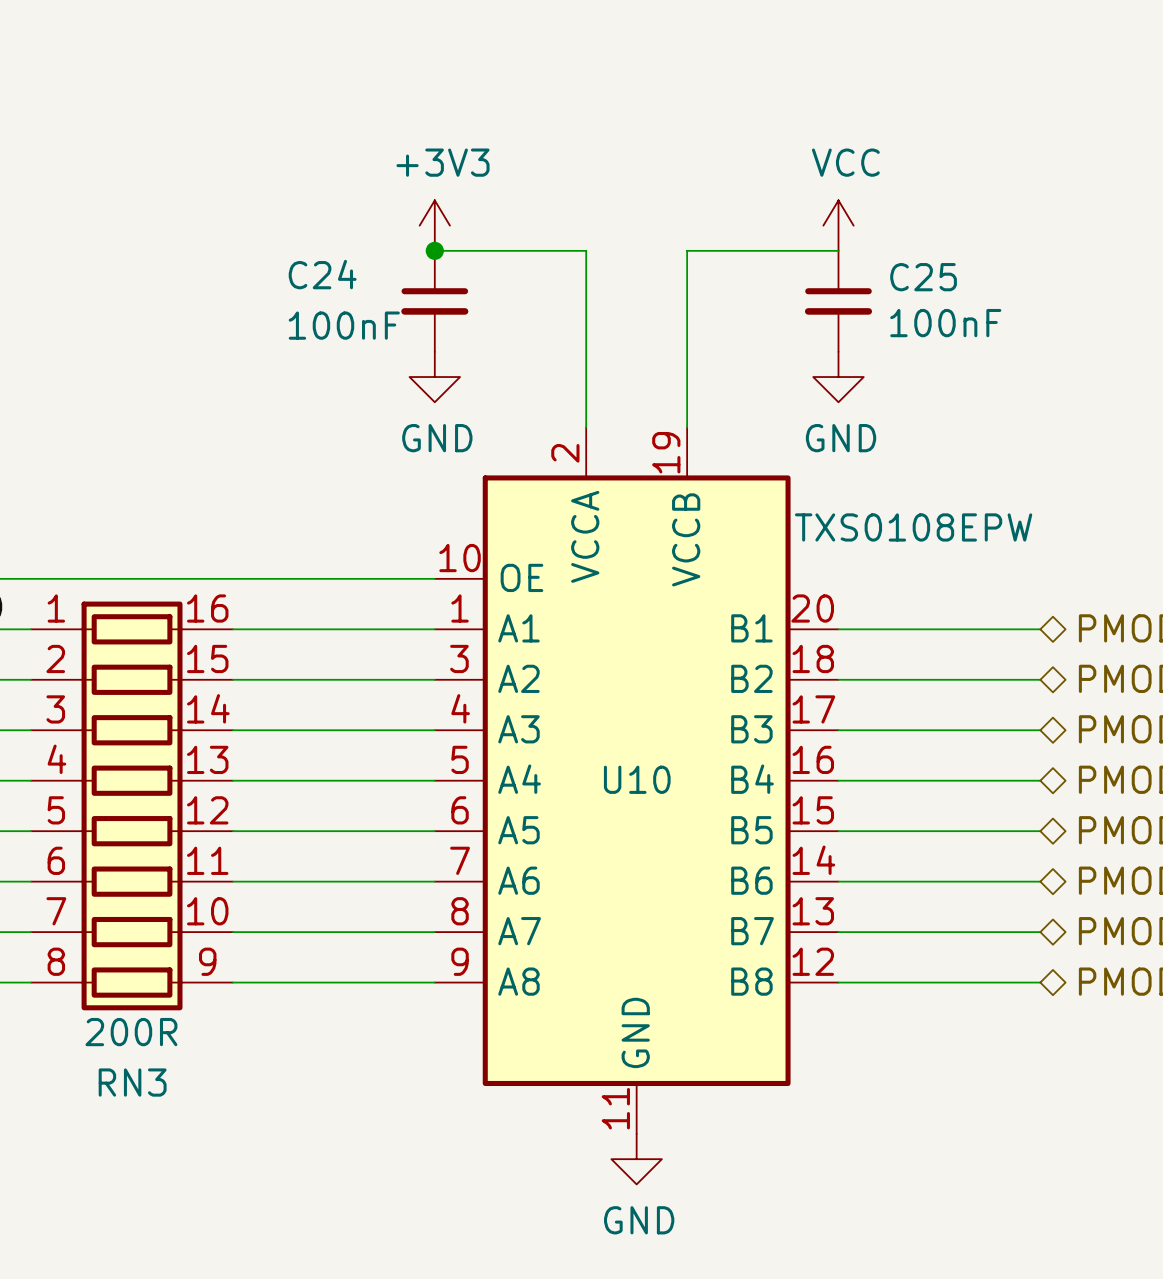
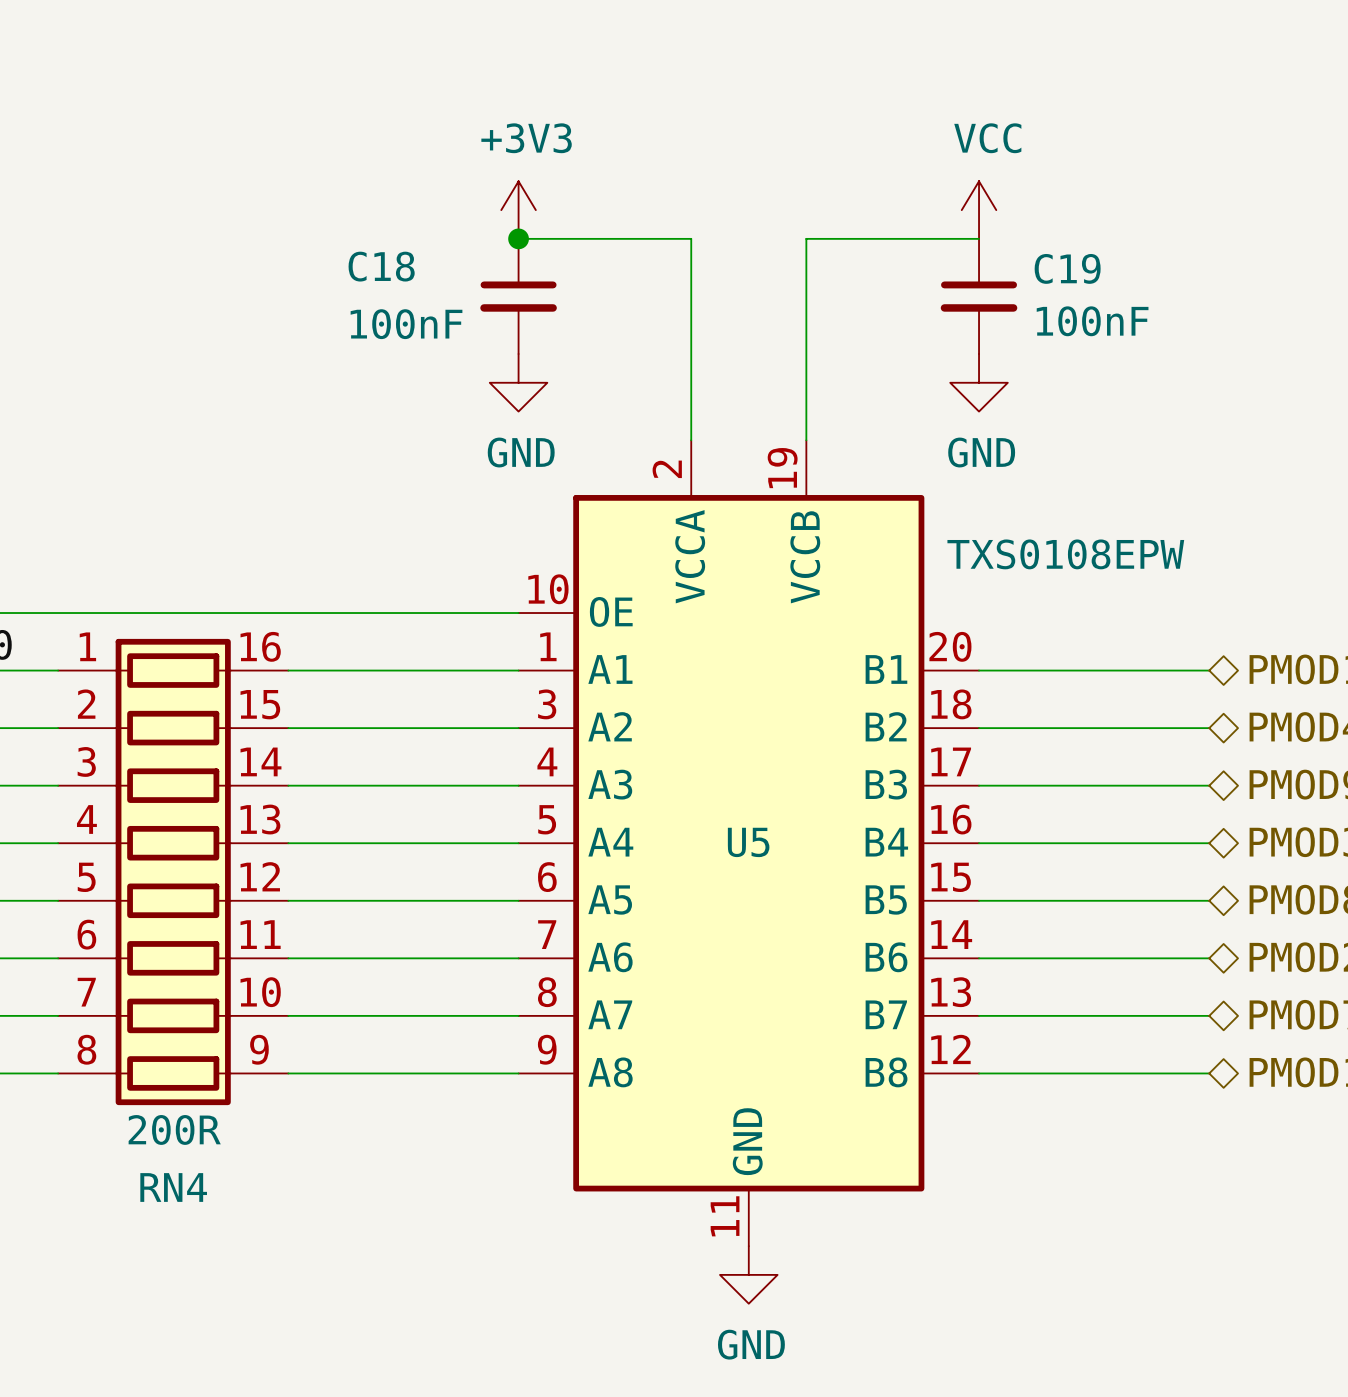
C24 name: C24 (322, 274) -> C18 (381, 266)
C25 name: C25 (923, 277) -> C19 (1067, 268)
U10 name: U10 (637, 779) -> U5 (748, 842)
RN3 name: RN3 (132, 1082) -> RN4 (173, 1187)

